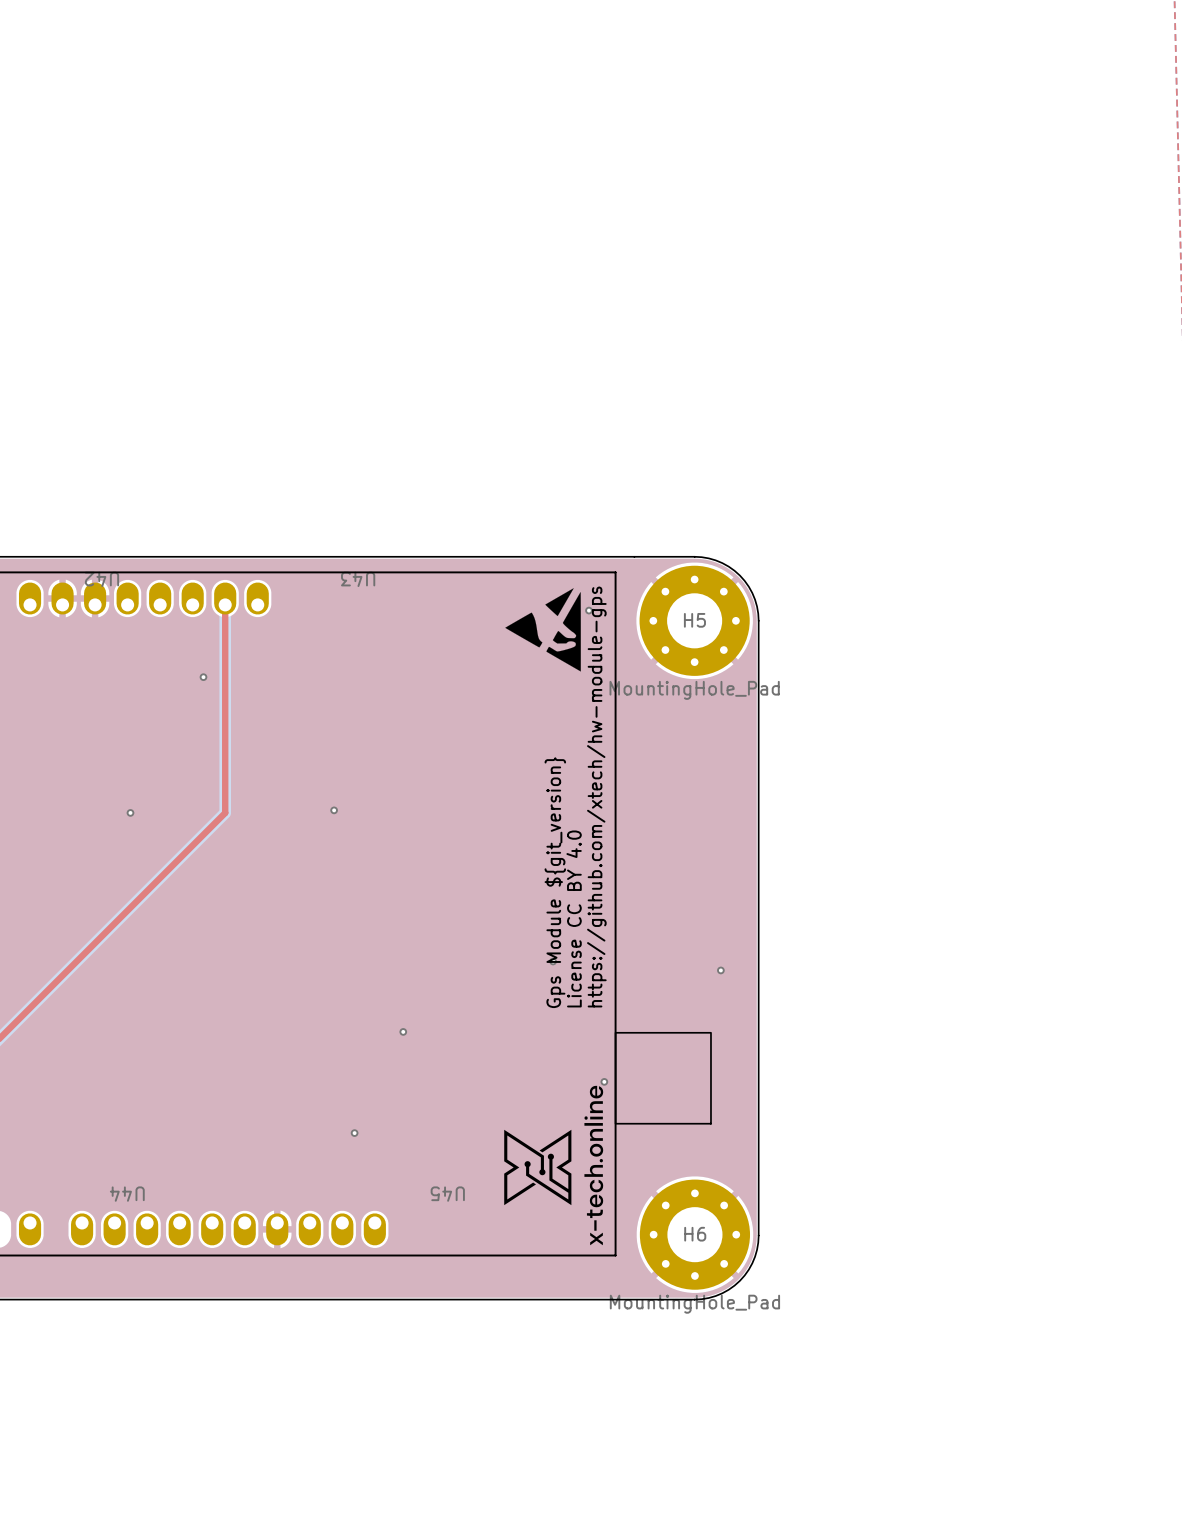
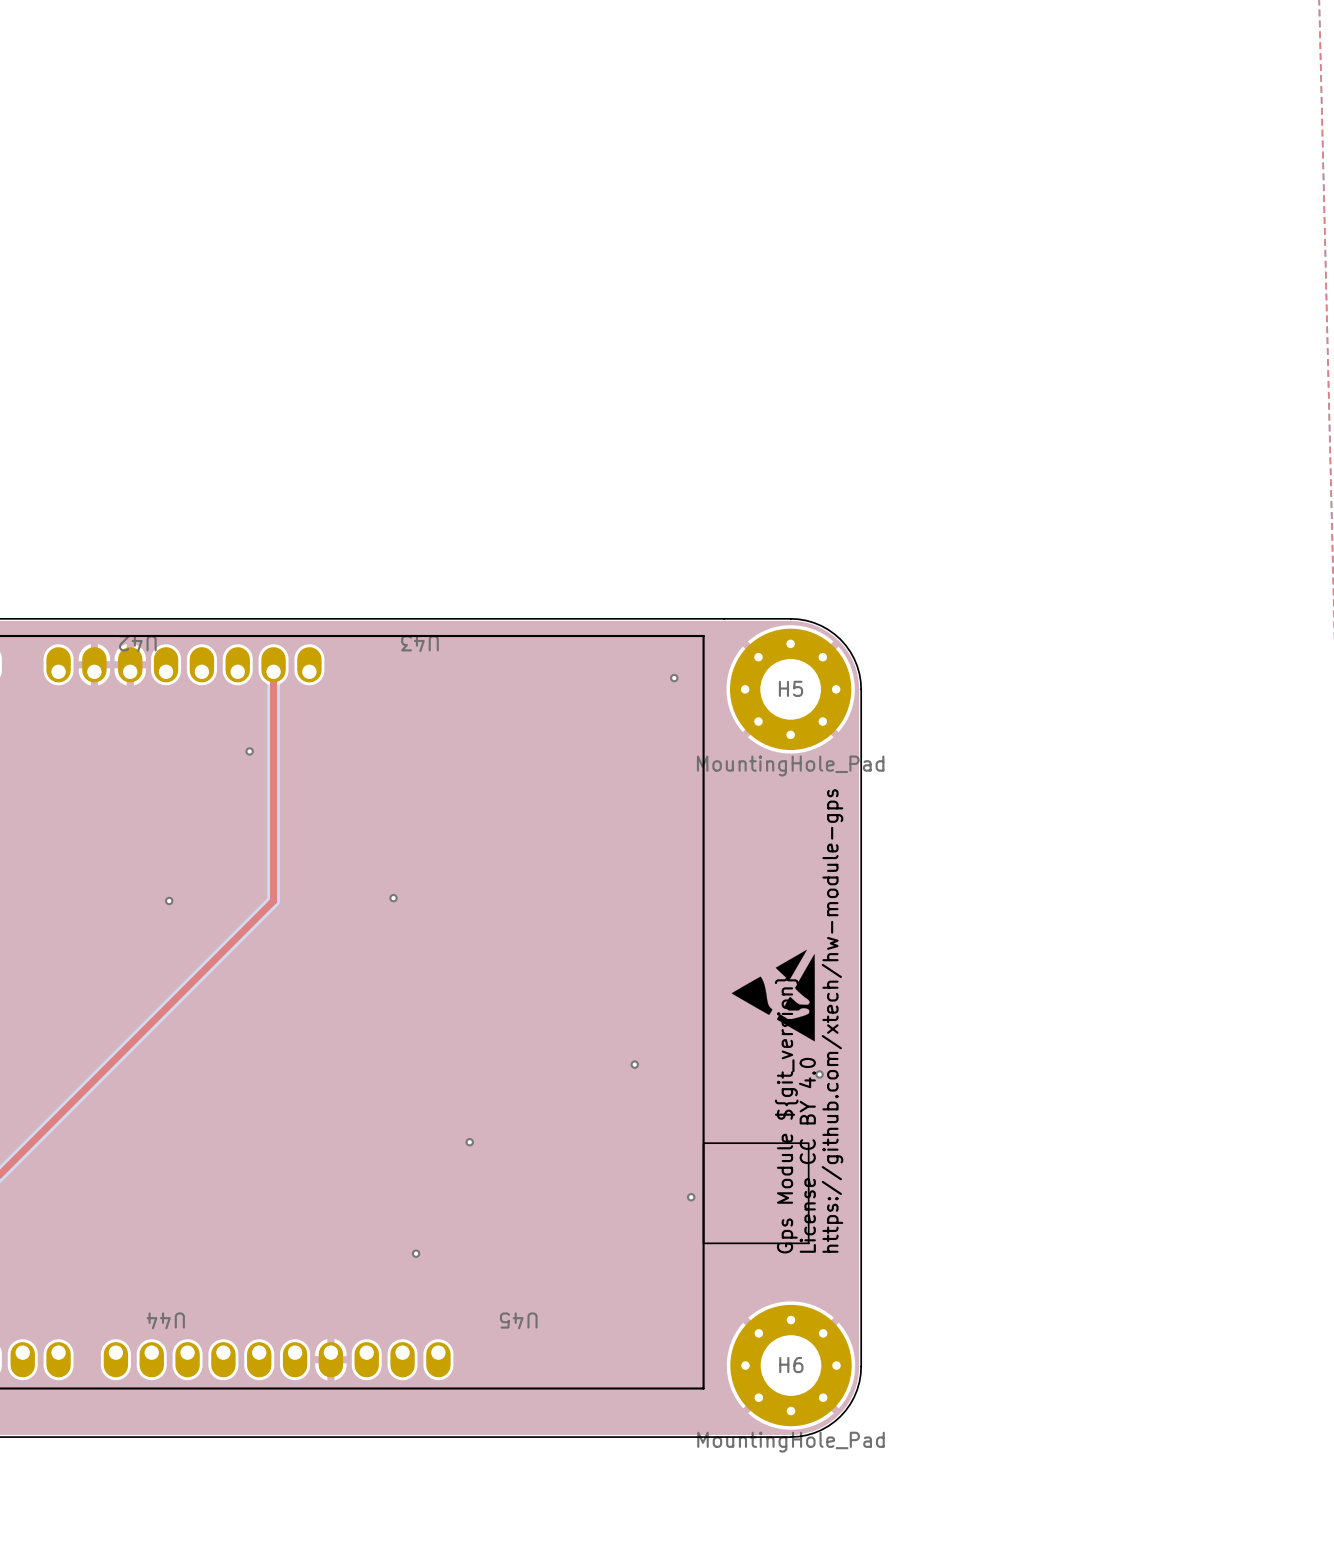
drawing position: (543, 629) -> (773, 995)
text position: https://github.com/xtech/hw-module-gps (596, 796) -> https://github.com/xtech/hw-module-gps (832, 1020)
text position: Gps Module ${git_version} (555, 882) -> Gps Module ${git_version} (786, 1115)
text position: License CC BY 4.0 (574, 918) -> License CC BY 4.0 (807, 1155)
drawing: [504, 1085, 604, 1246] -> none

